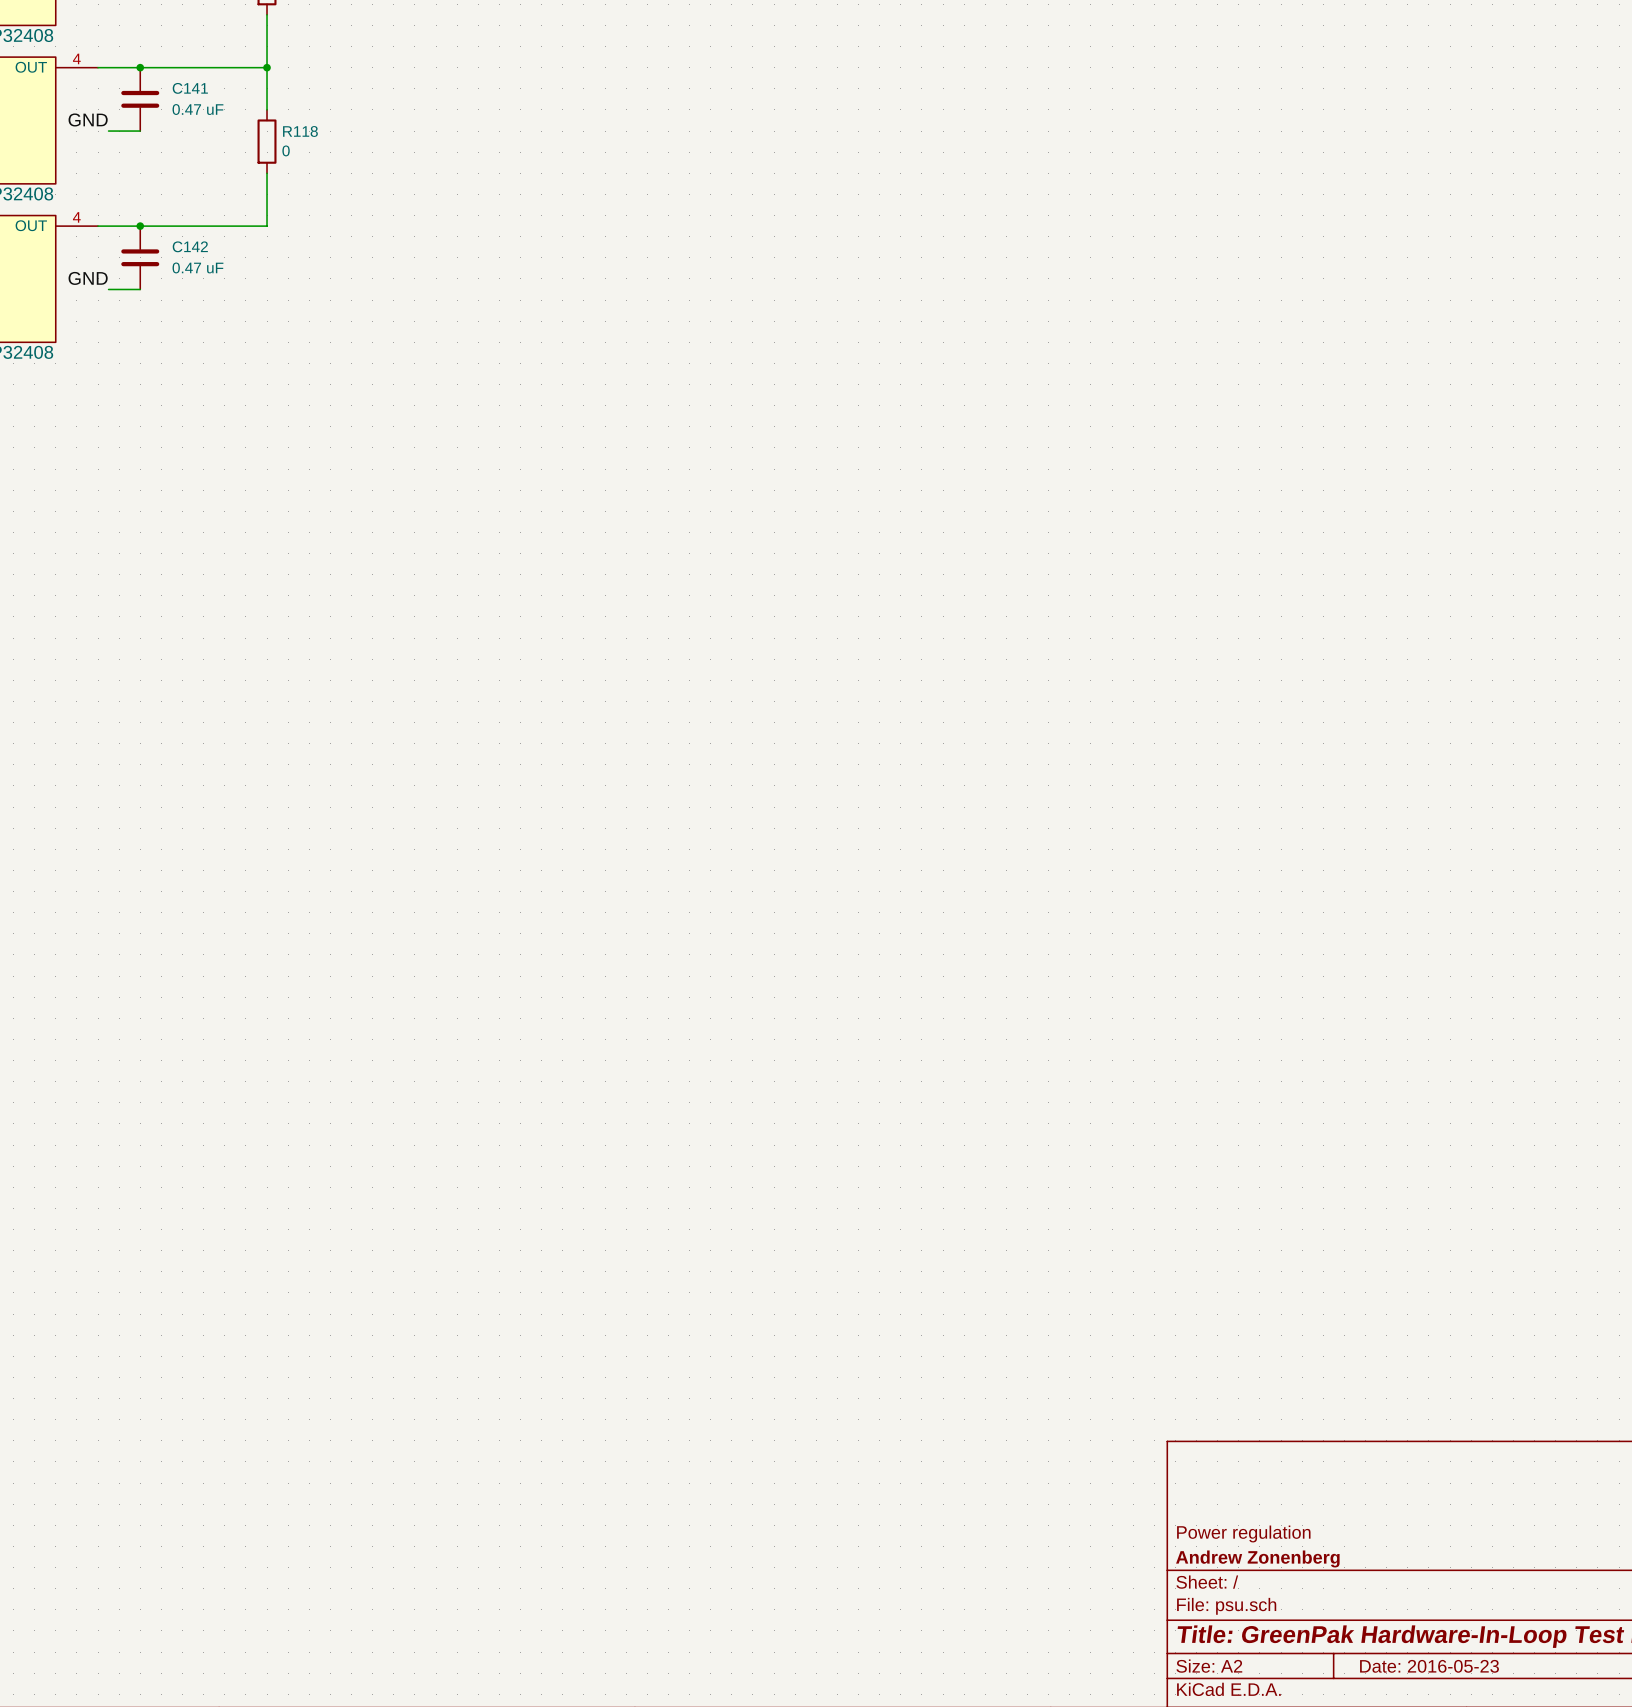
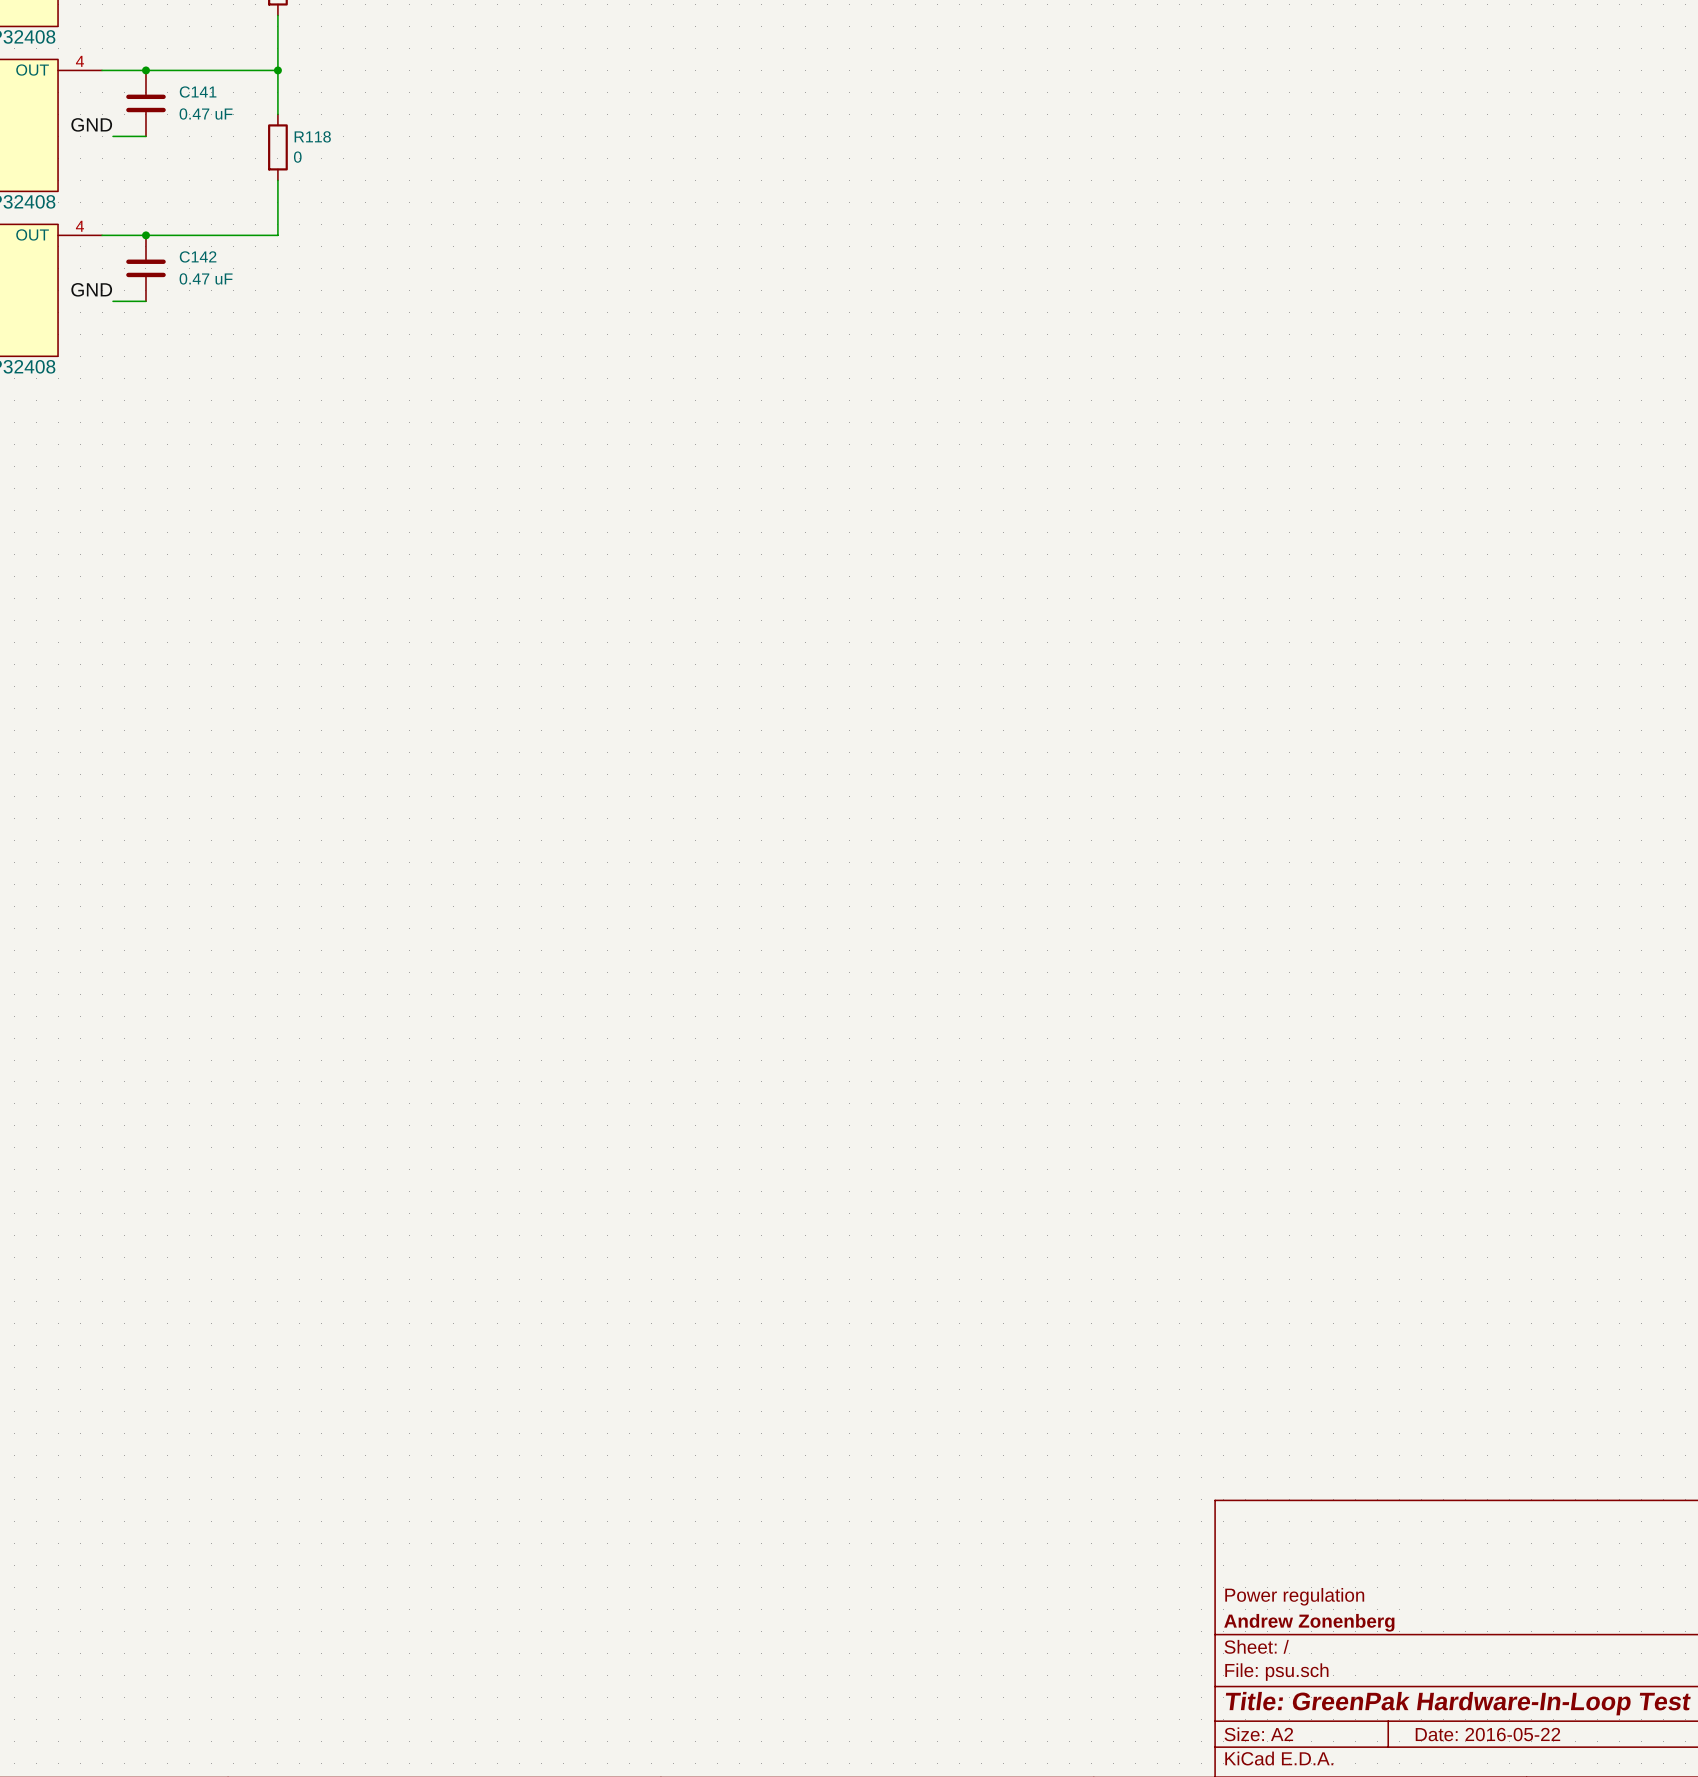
title block: Date: 2016-05-23 (1429, 1666) -> Date: 2016-05-22 (1487, 1734)

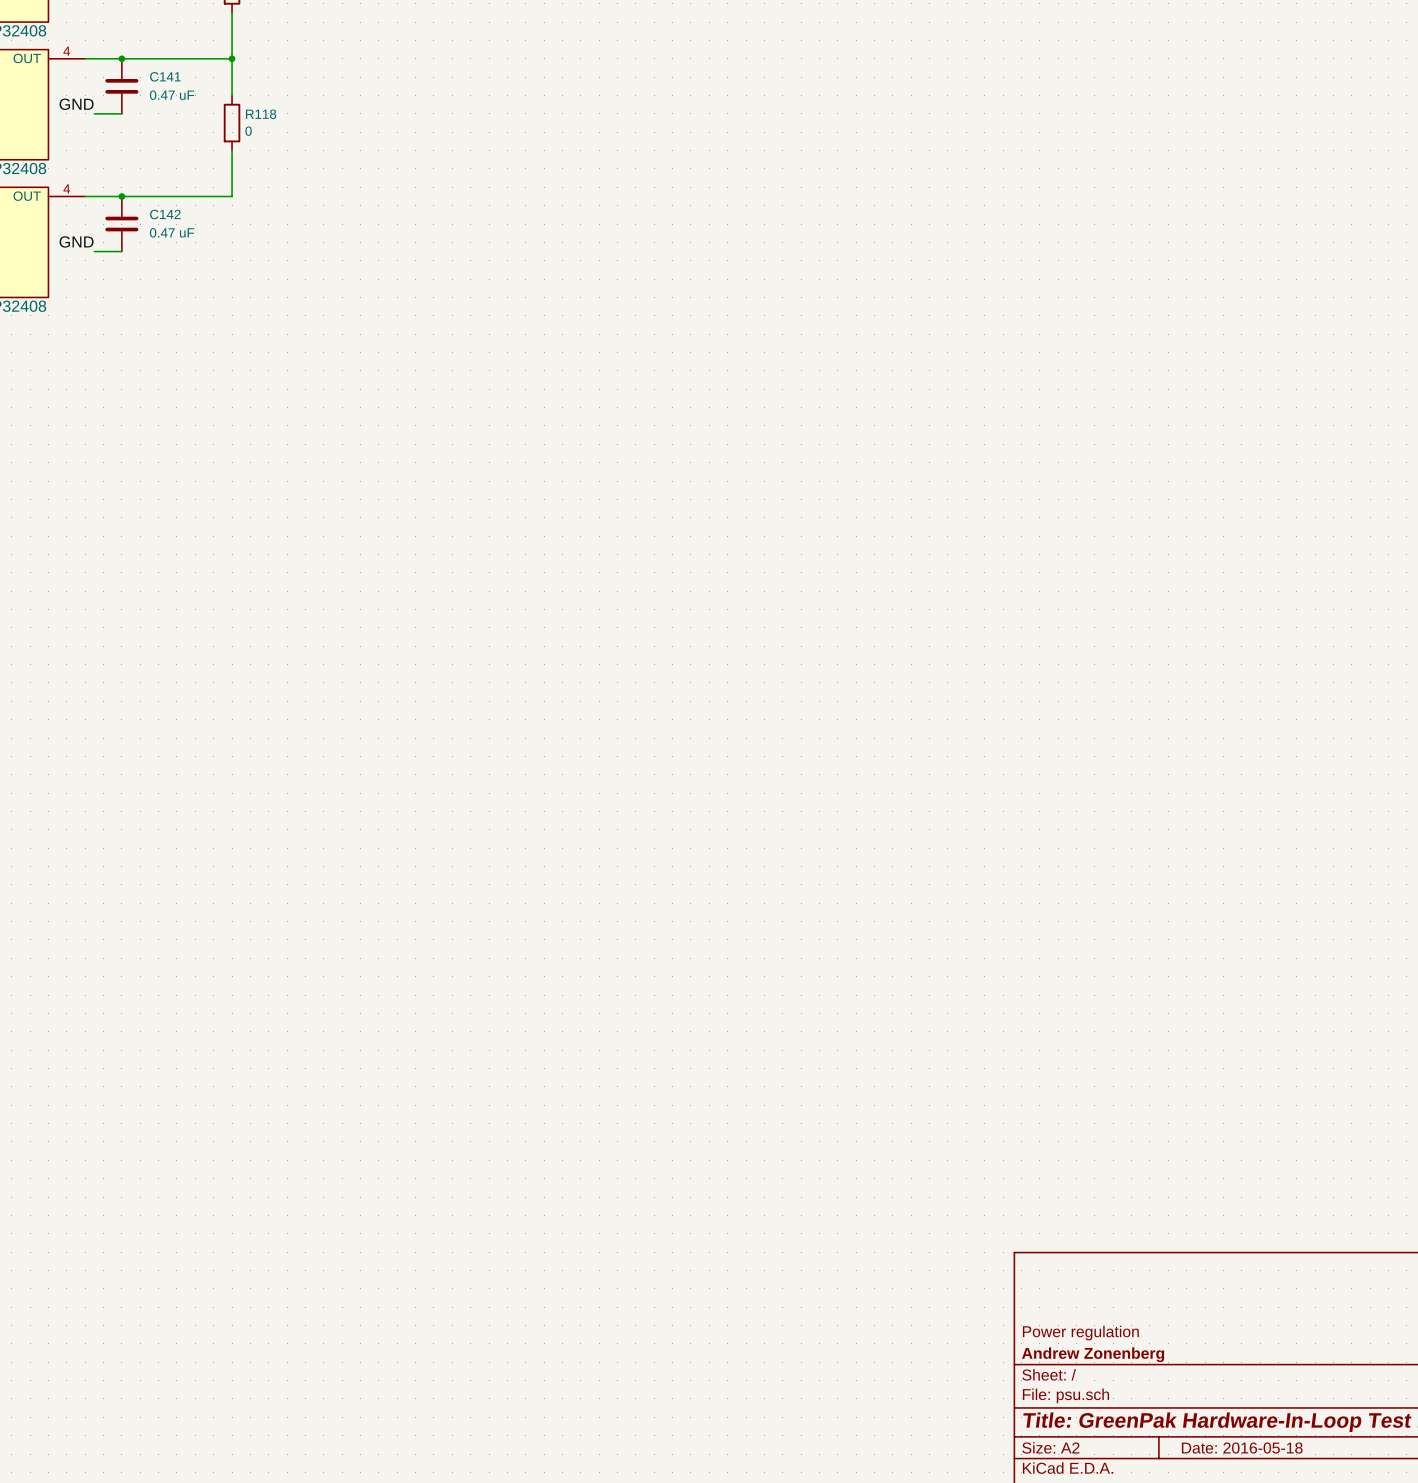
title block: Date: 2016-05-22 (1487, 1734) -> Date: 2016-05-18 (1242, 1448)

